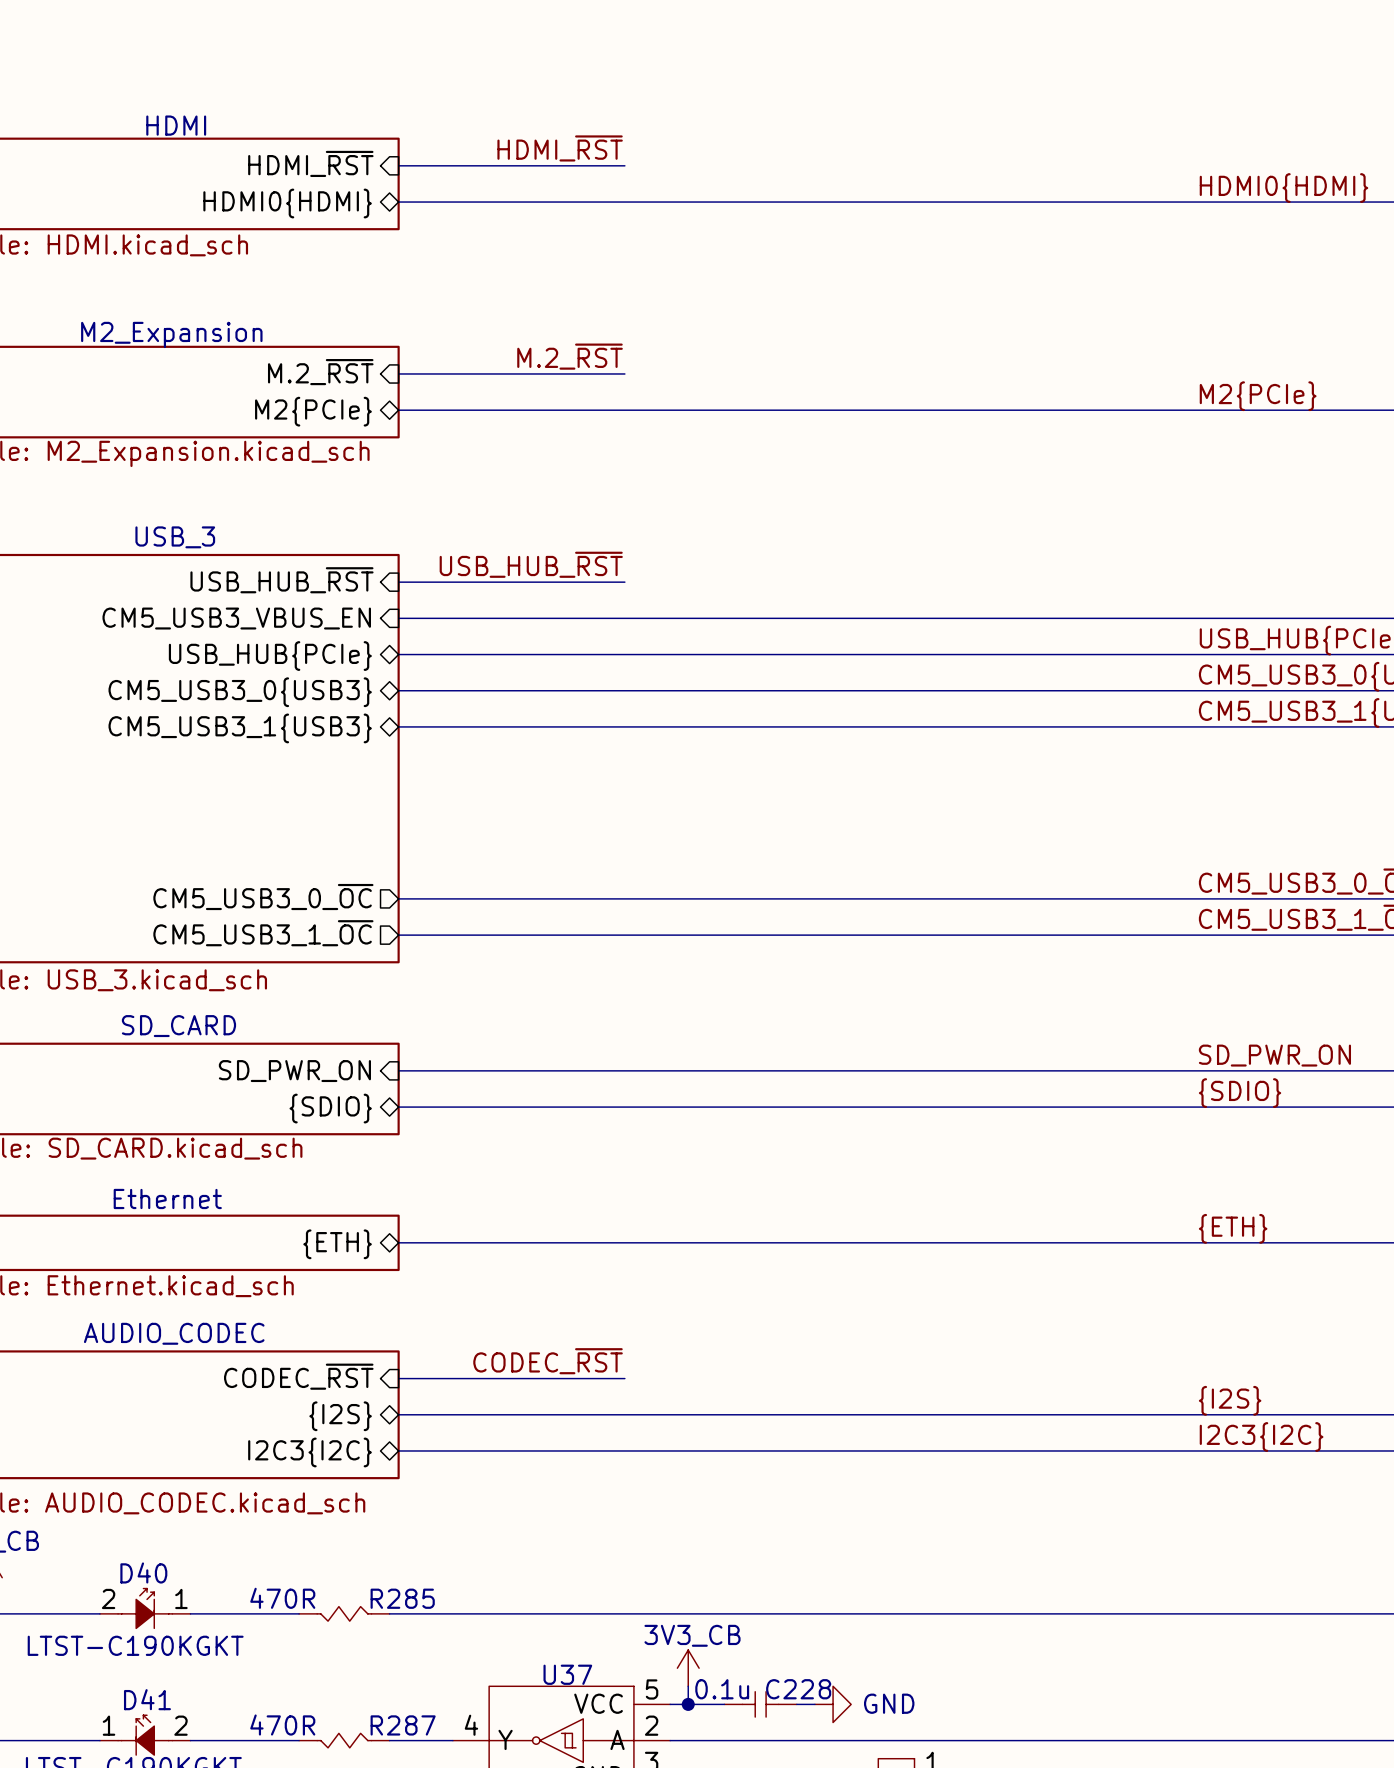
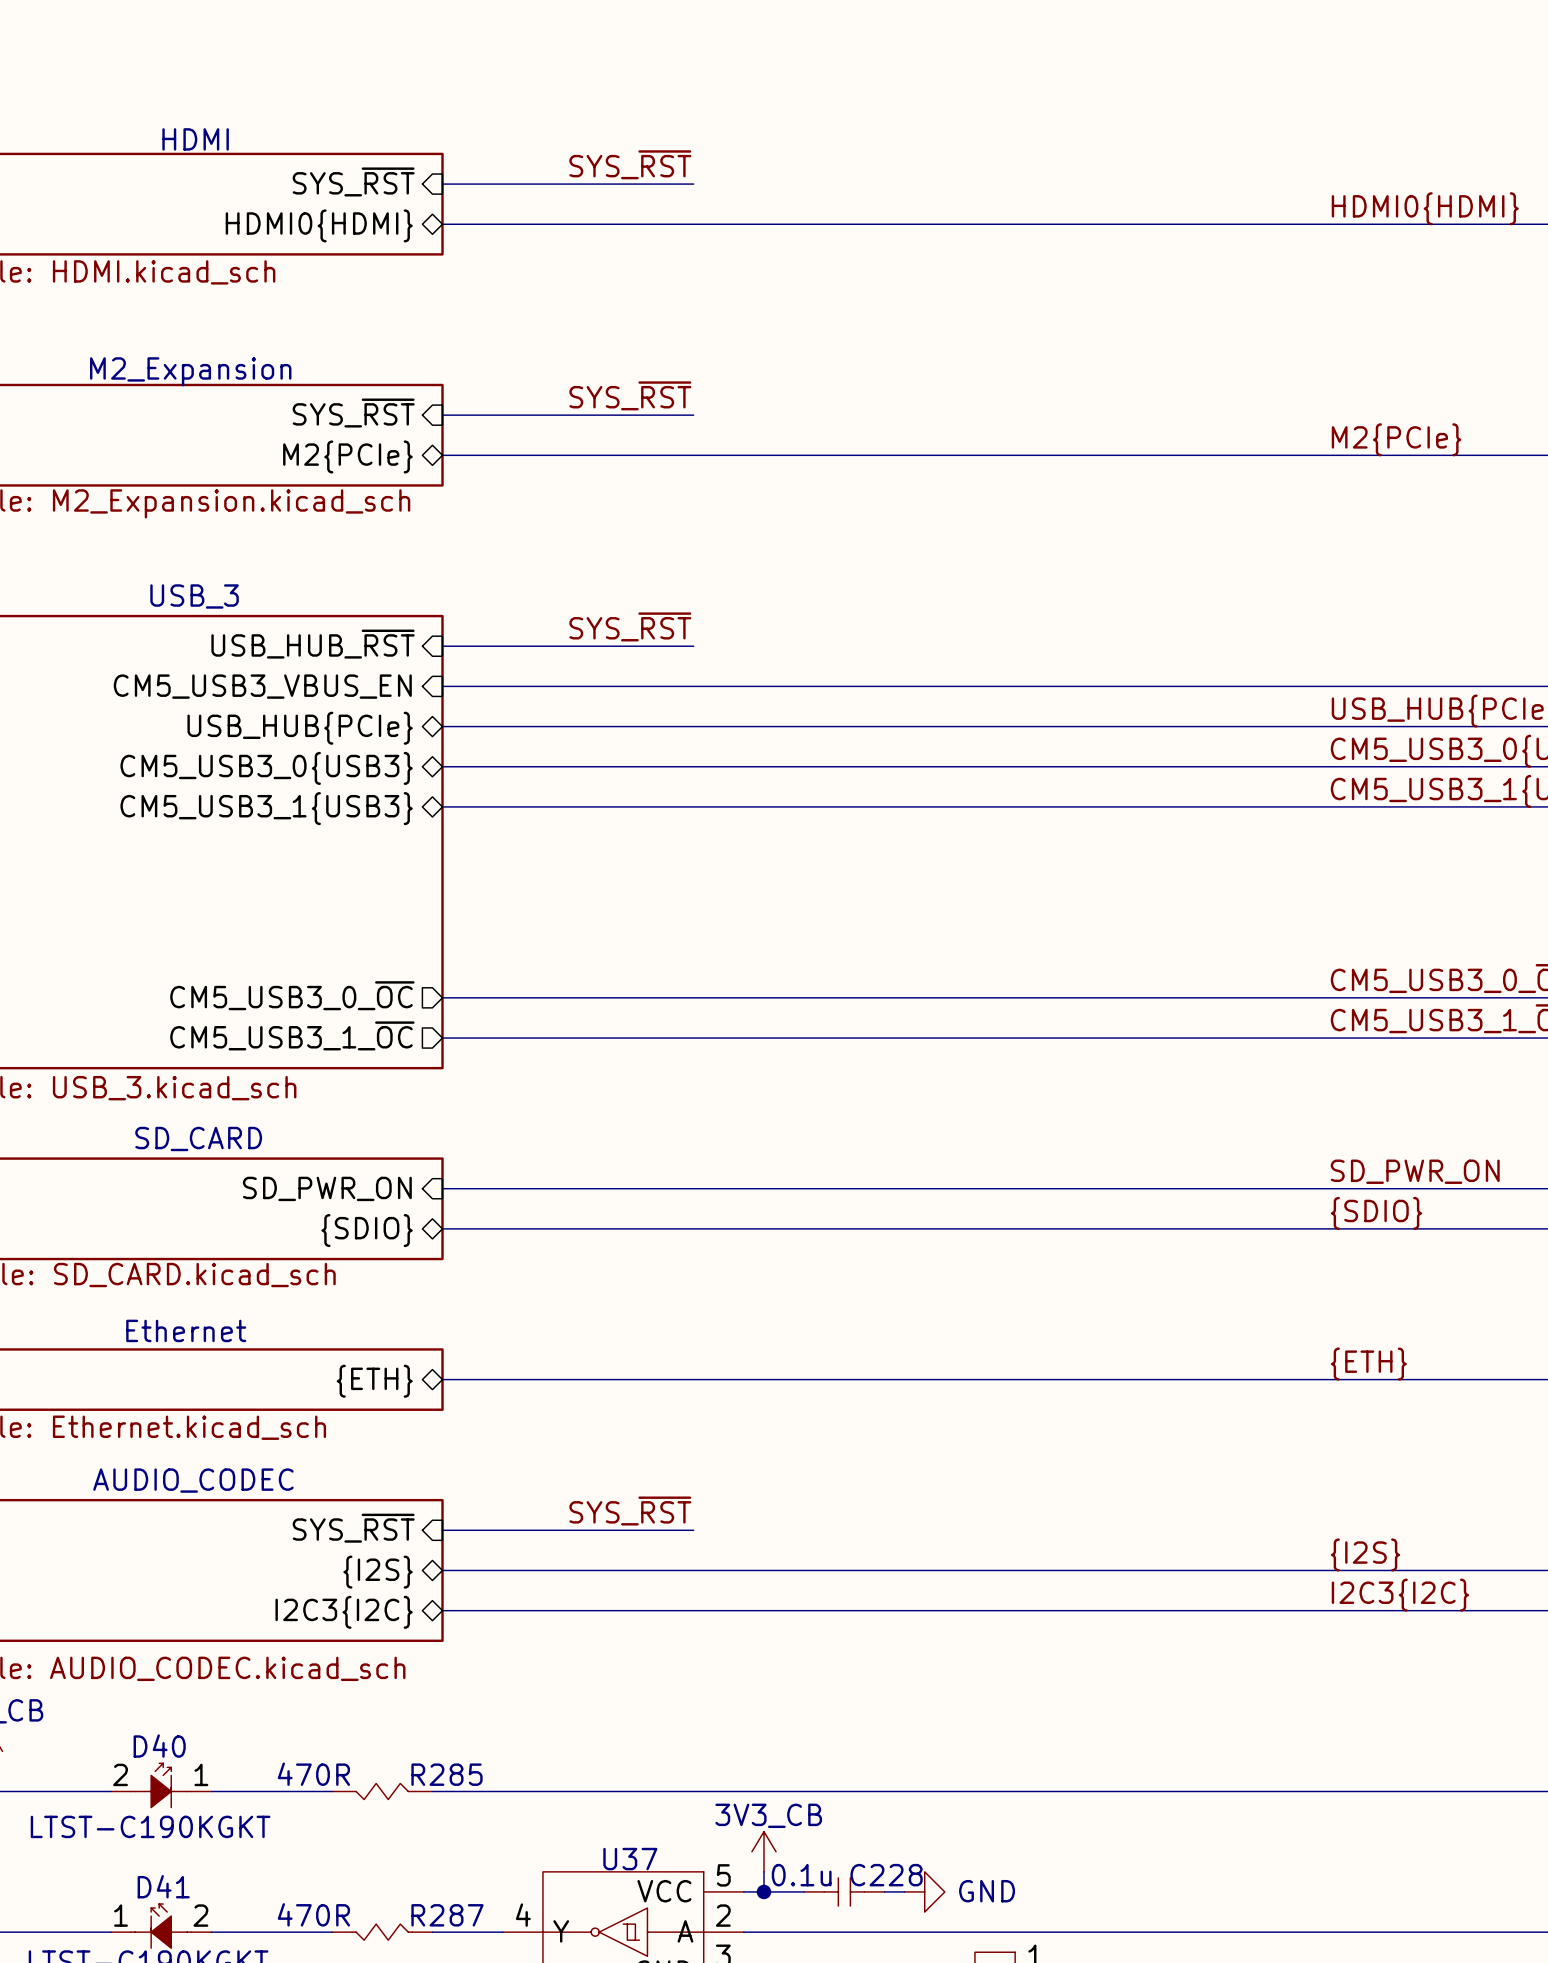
label: HDMI_~{RST} (560, 148) -> SYS_~{RST} (630, 164)
sheet pin: HDMI_~{RST} (310, 163) -> SYS_~{RST} (353, 181)
label: M.2_~{RST} (570, 356) -> SYS_~{RST} (630, 395)
sheet pin: M.2_~{RST} (320, 372) -> SYS_~{RST} (353, 413)
label: USB_HUB_~{RST} (531, 564) -> SYS_~{RST} (630, 626)
label: CODEC_~{RST} (548, 1361) -> SYS_~{RST} (630, 1511)
sheet pin: CODEC_~{RST} (298, 1376) -> SYS_~{RST} (353, 1528)

